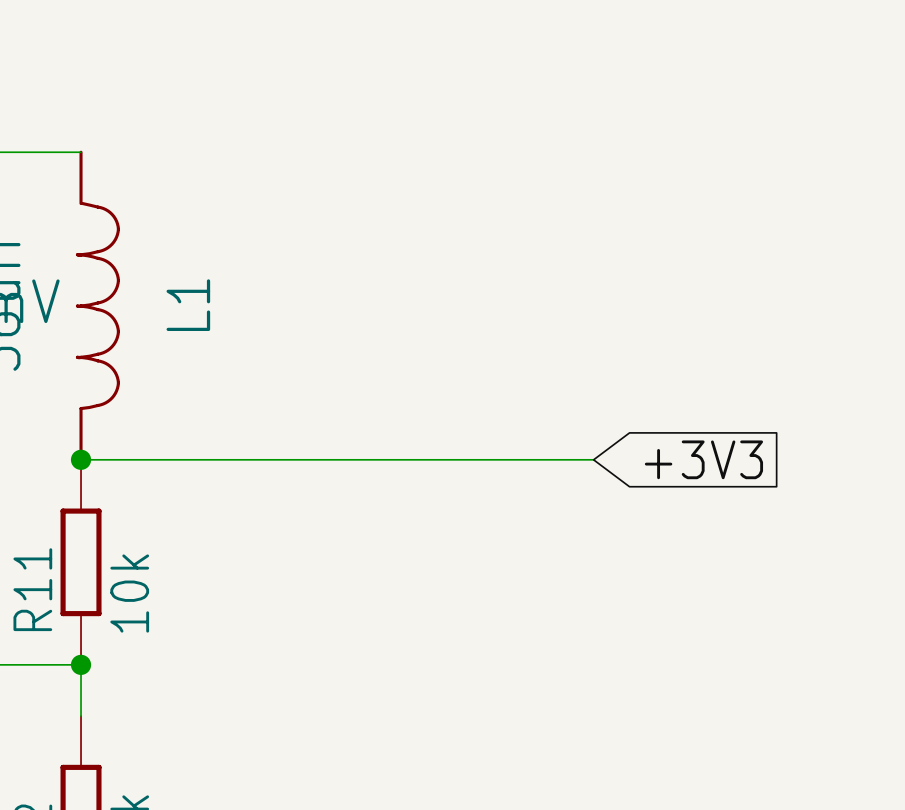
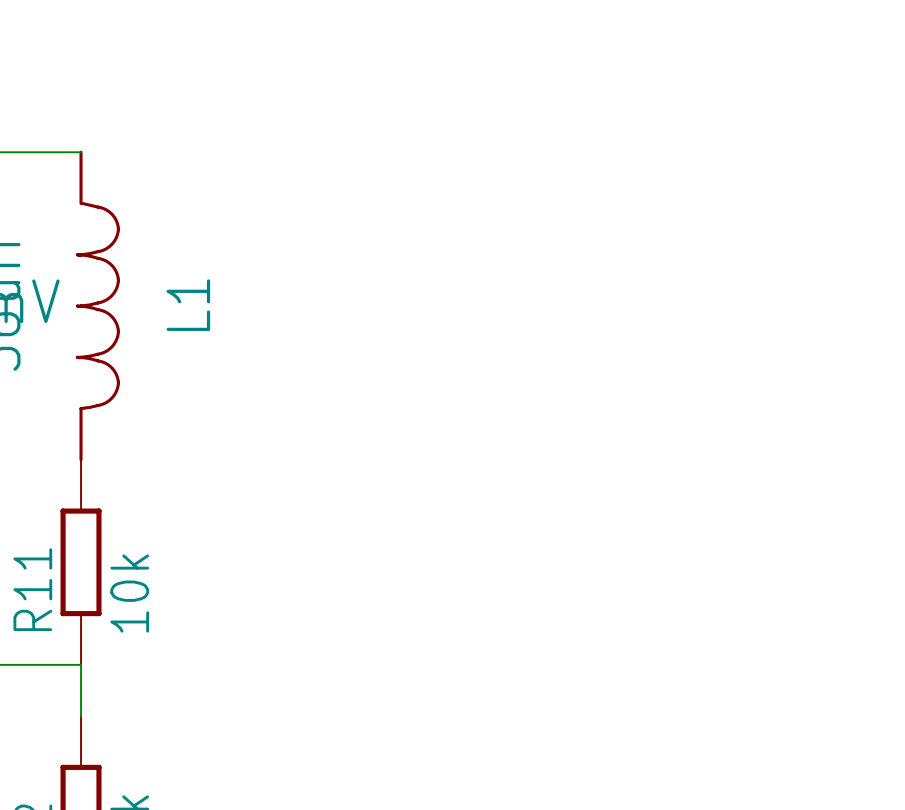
wire: (81, 459) (593, 459) -> none
junction: (81, 459) -> none
global label: +3V3 (703, 459) -> none
junction: (81, 664) -> none

